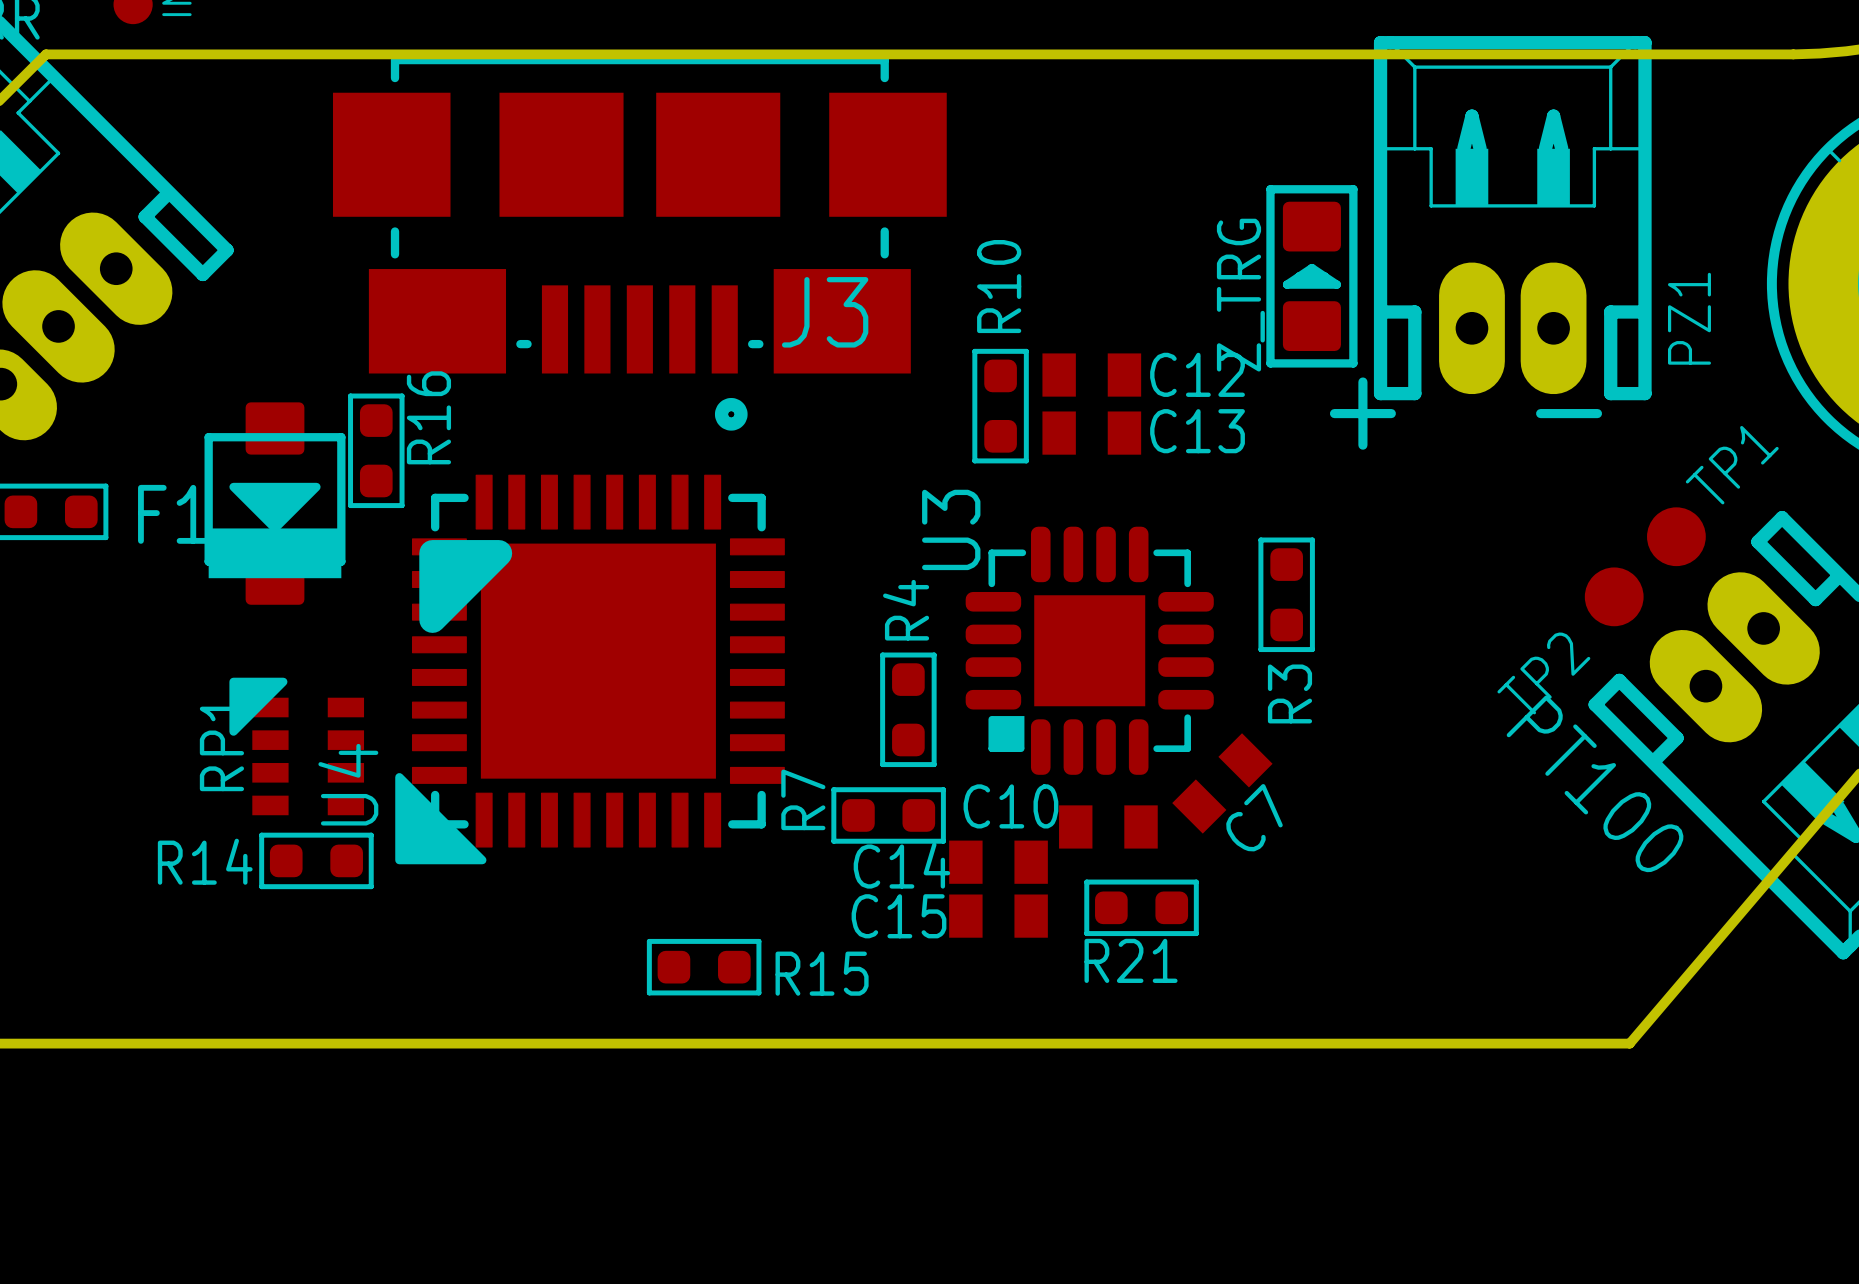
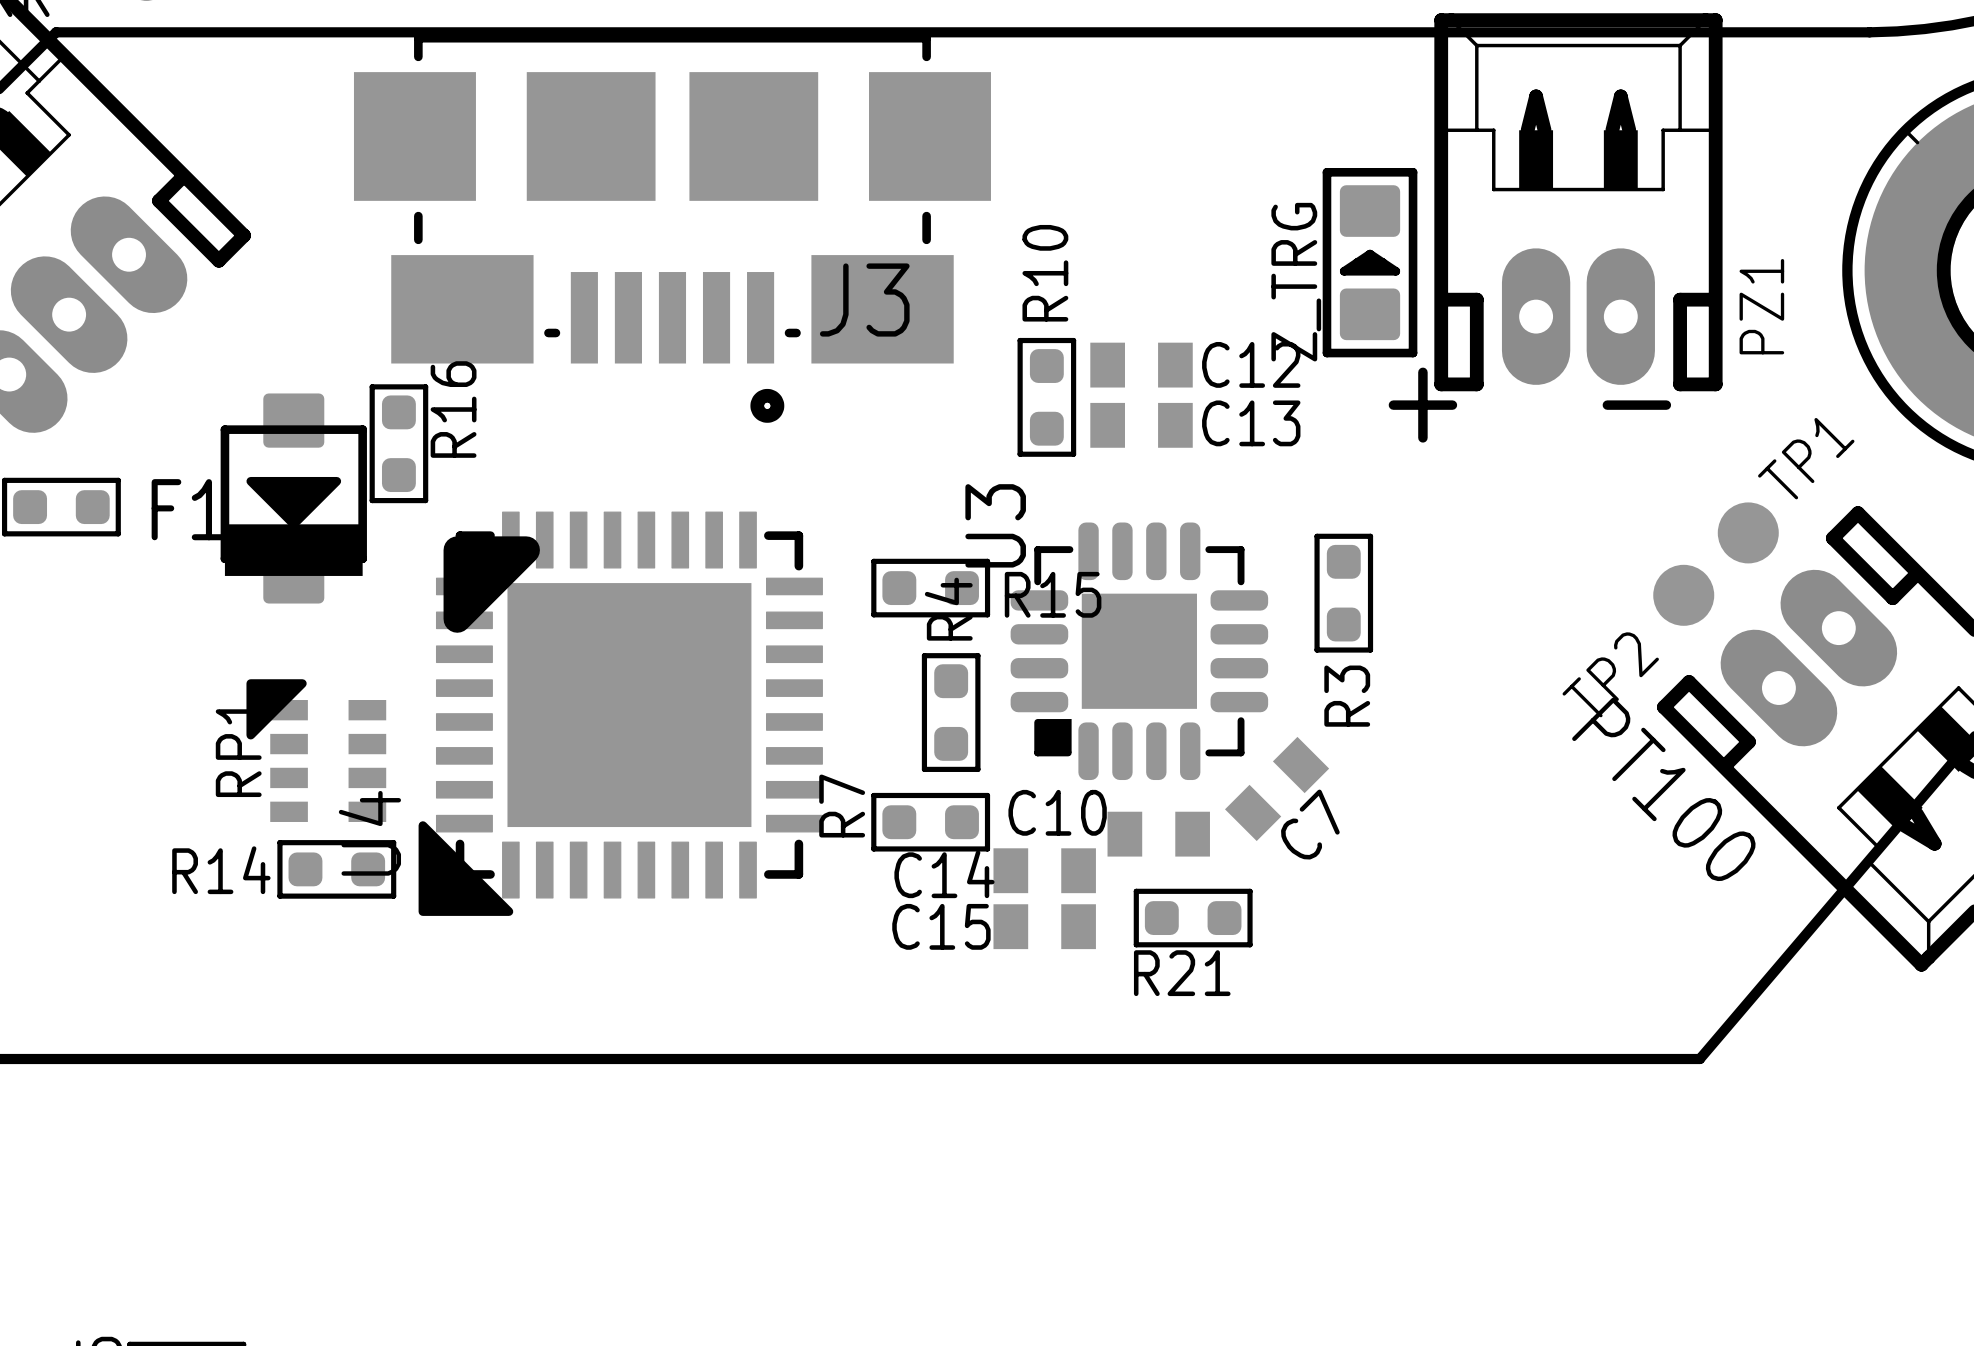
U4 position: (590, 669) -> (620, 713)
R15 position: (704, 967) -> (930, 588)

